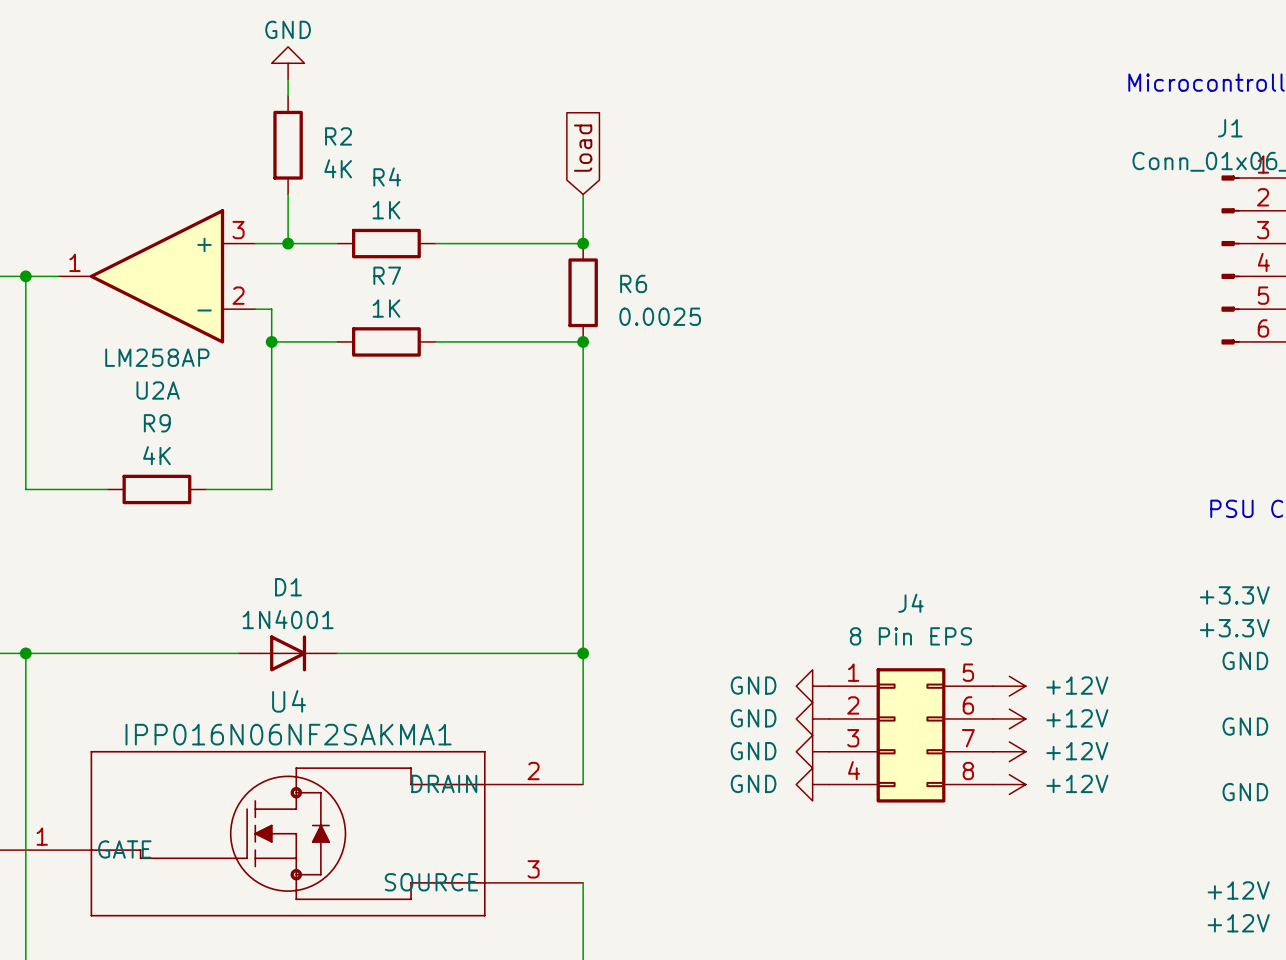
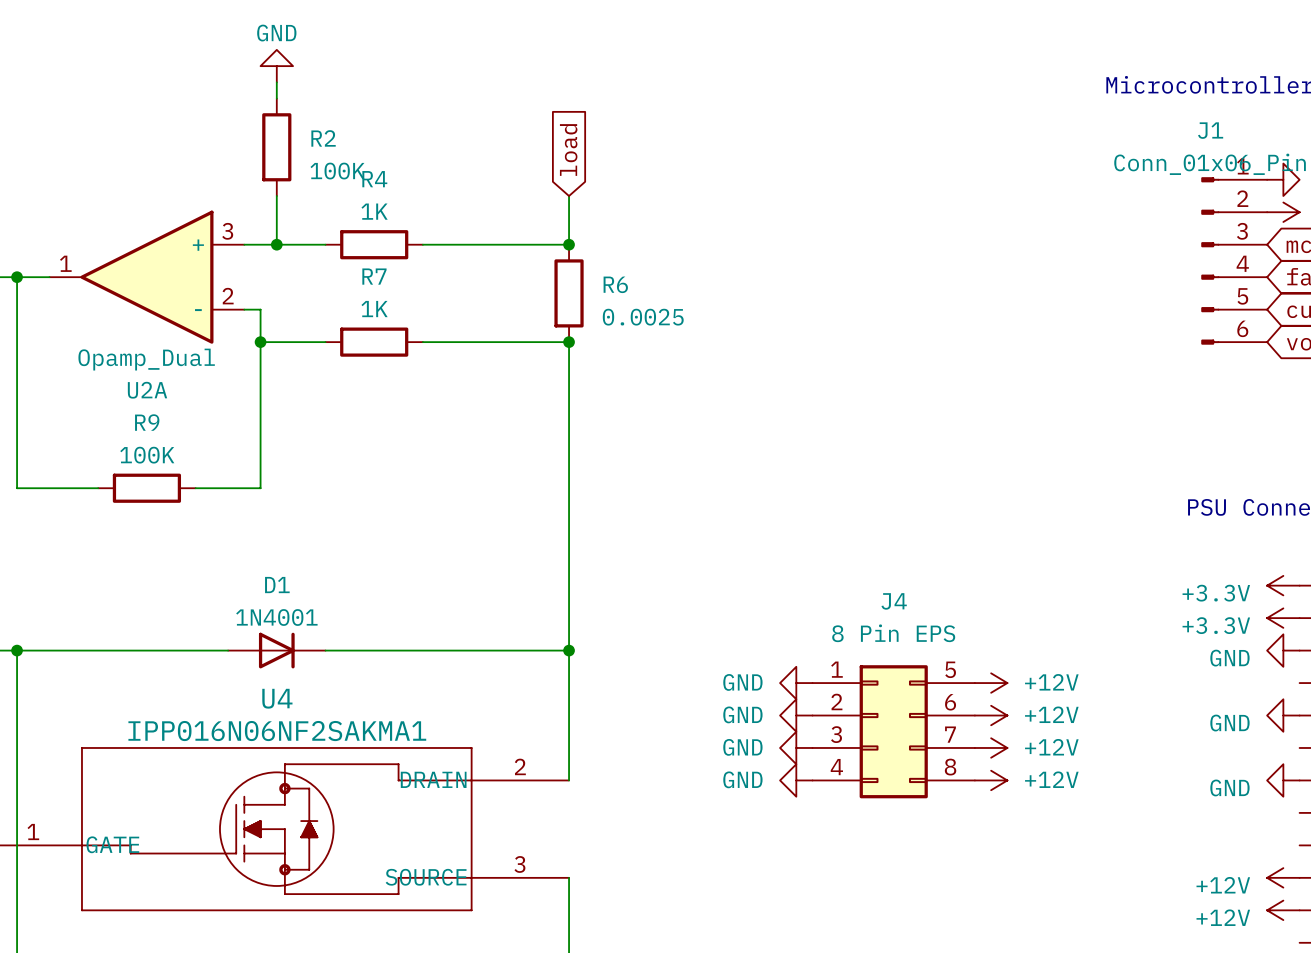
R2 value: 4K (338, 168) -> 100K (337, 171)
U2A value: LM258AP (157, 357) -> Opamp_Dual (146, 359)
R9 value: 4K (156, 455) -> 100K (147, 455)

